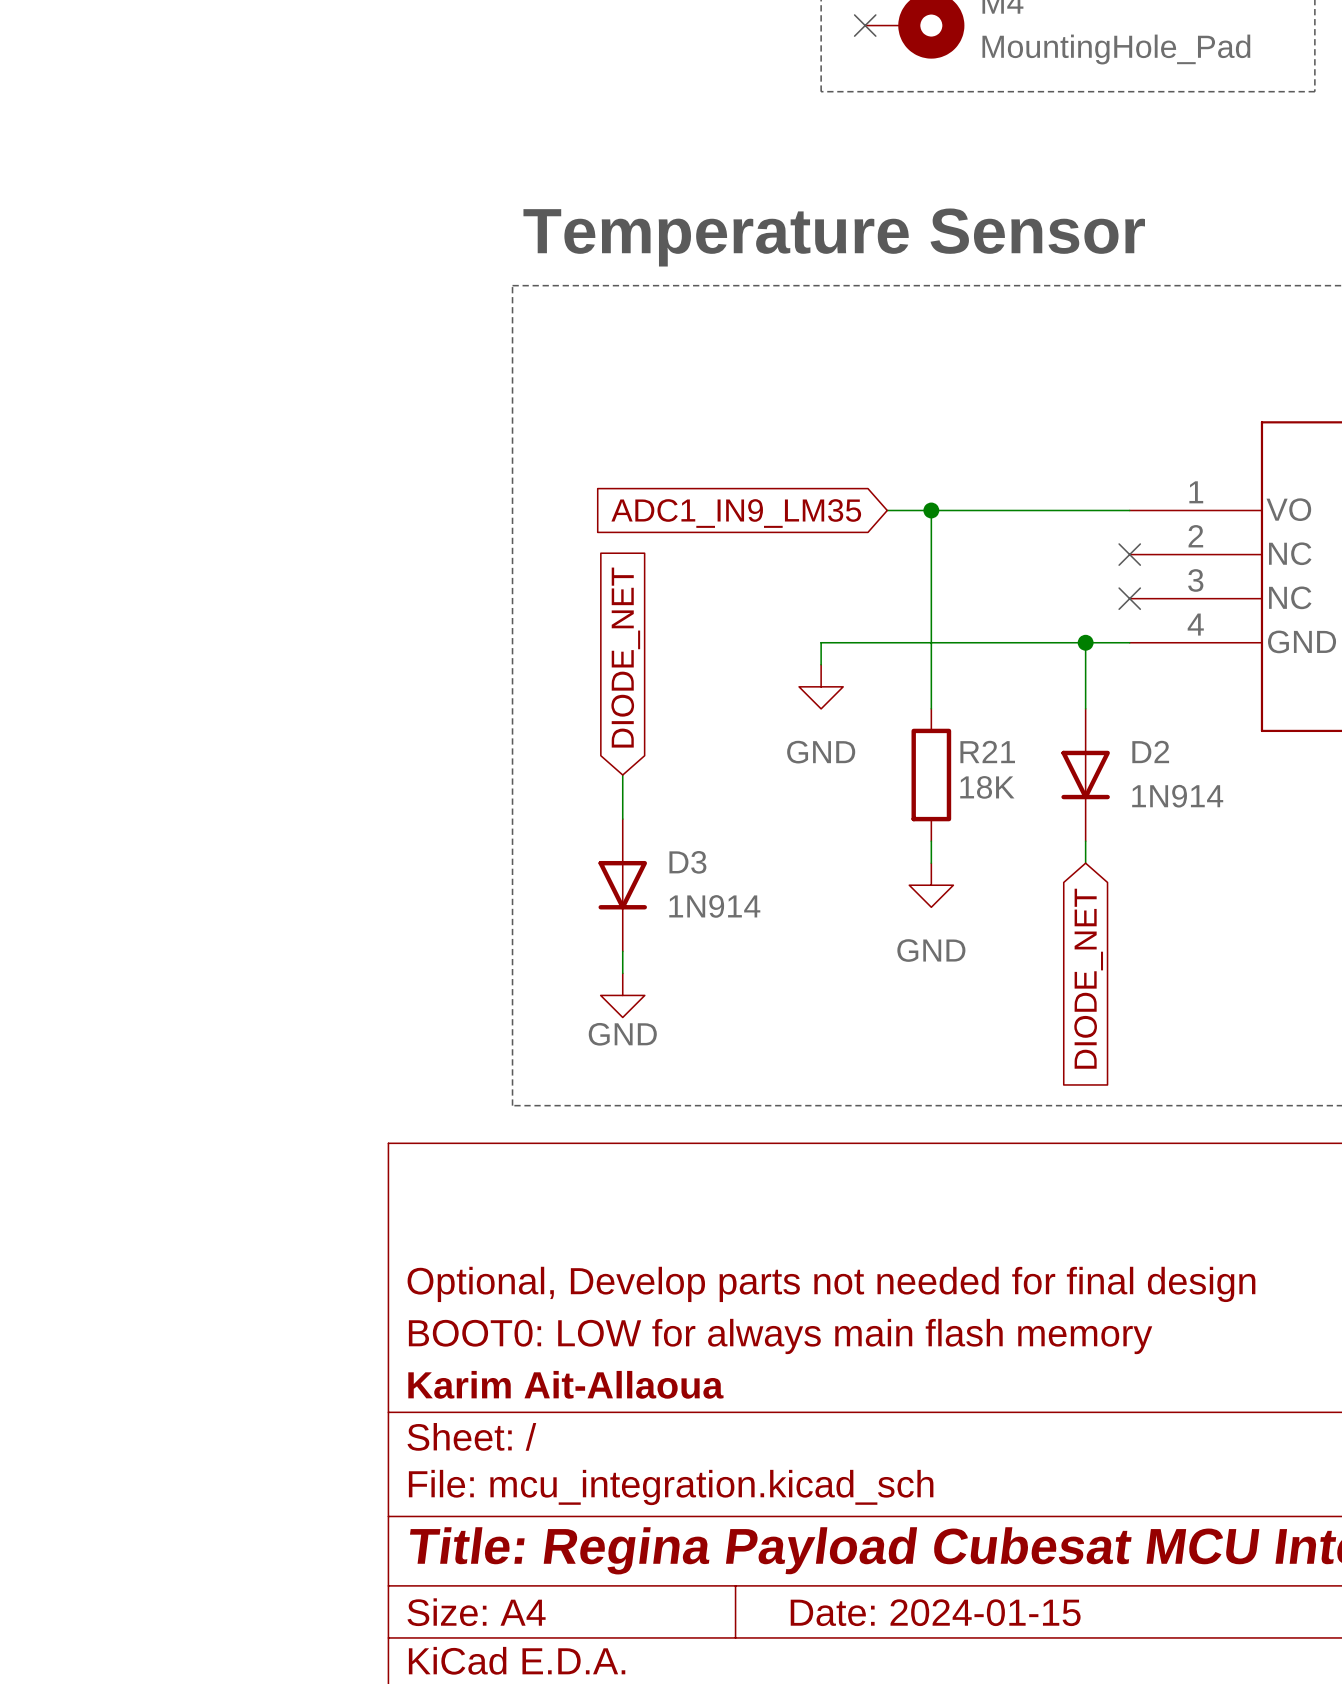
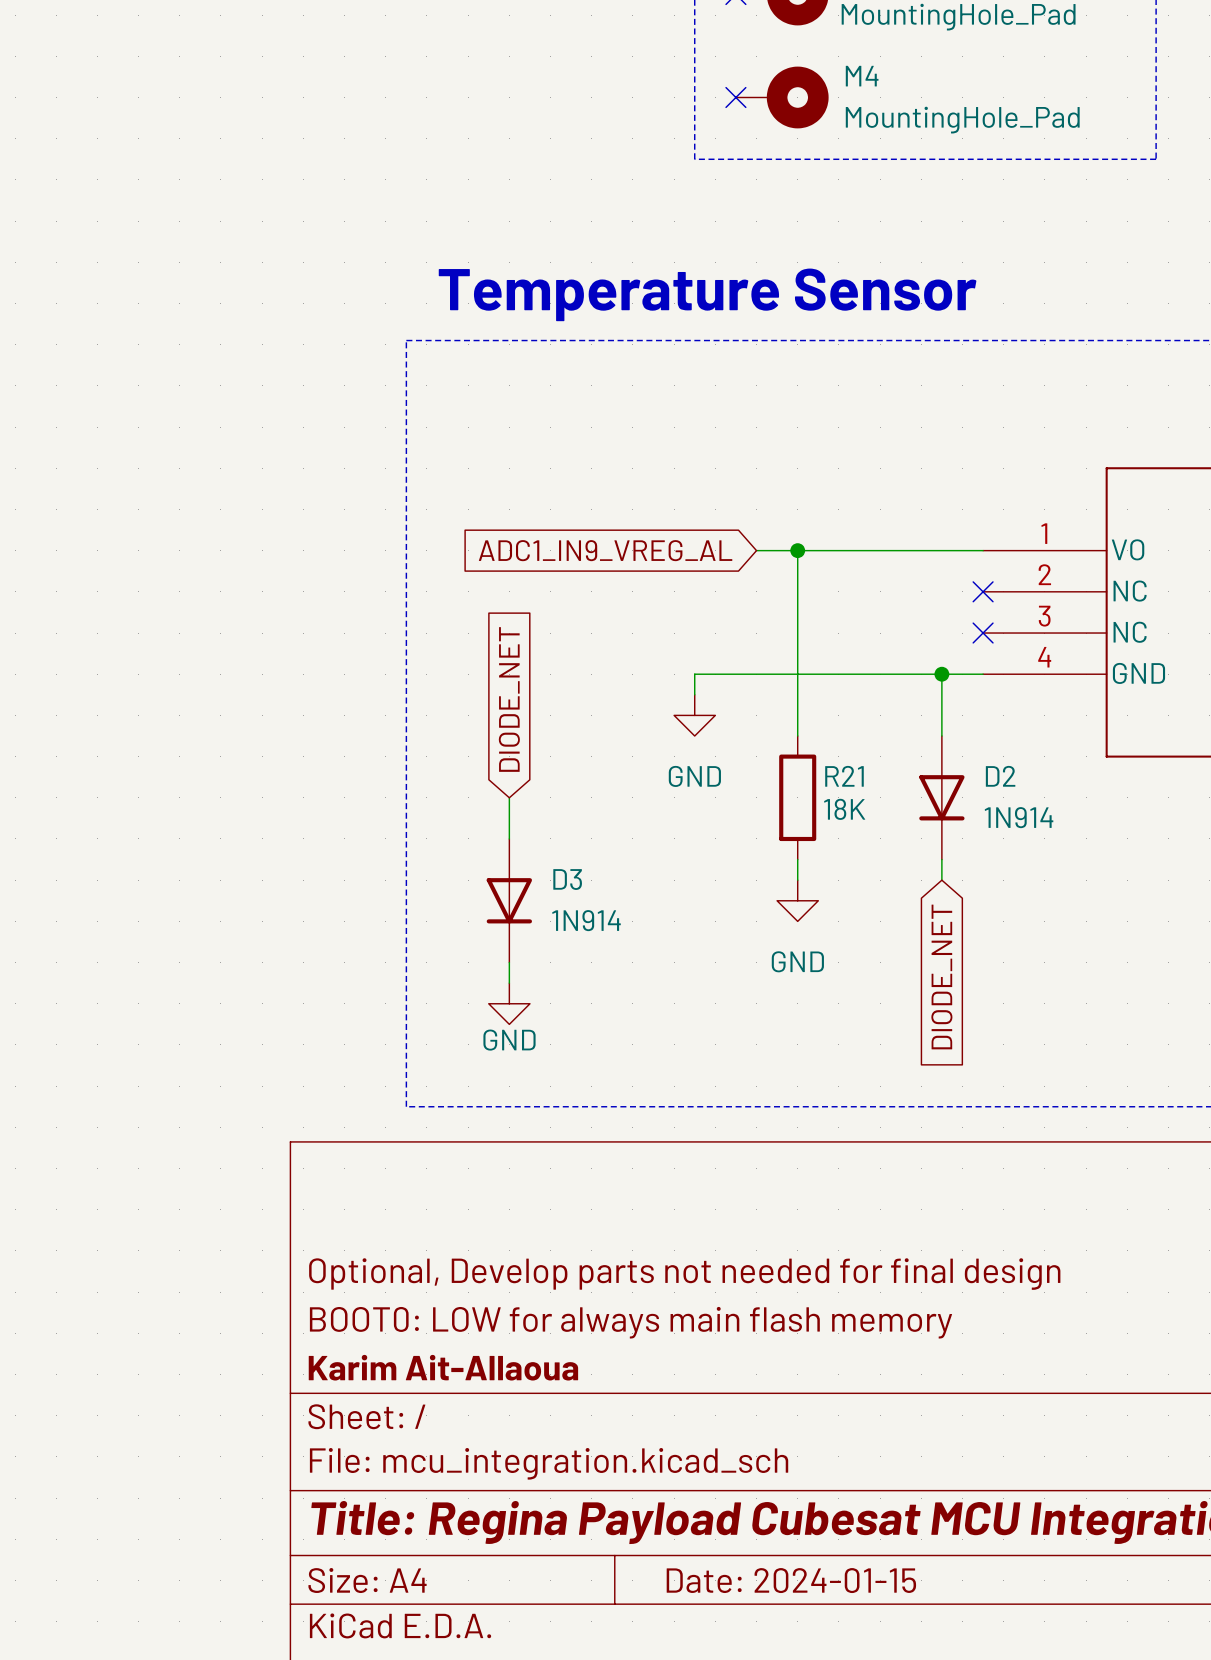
global label: ADC1_IN9_LM35 (736, 513) -> ADC1_IN9_VREG_AL (605, 550)

